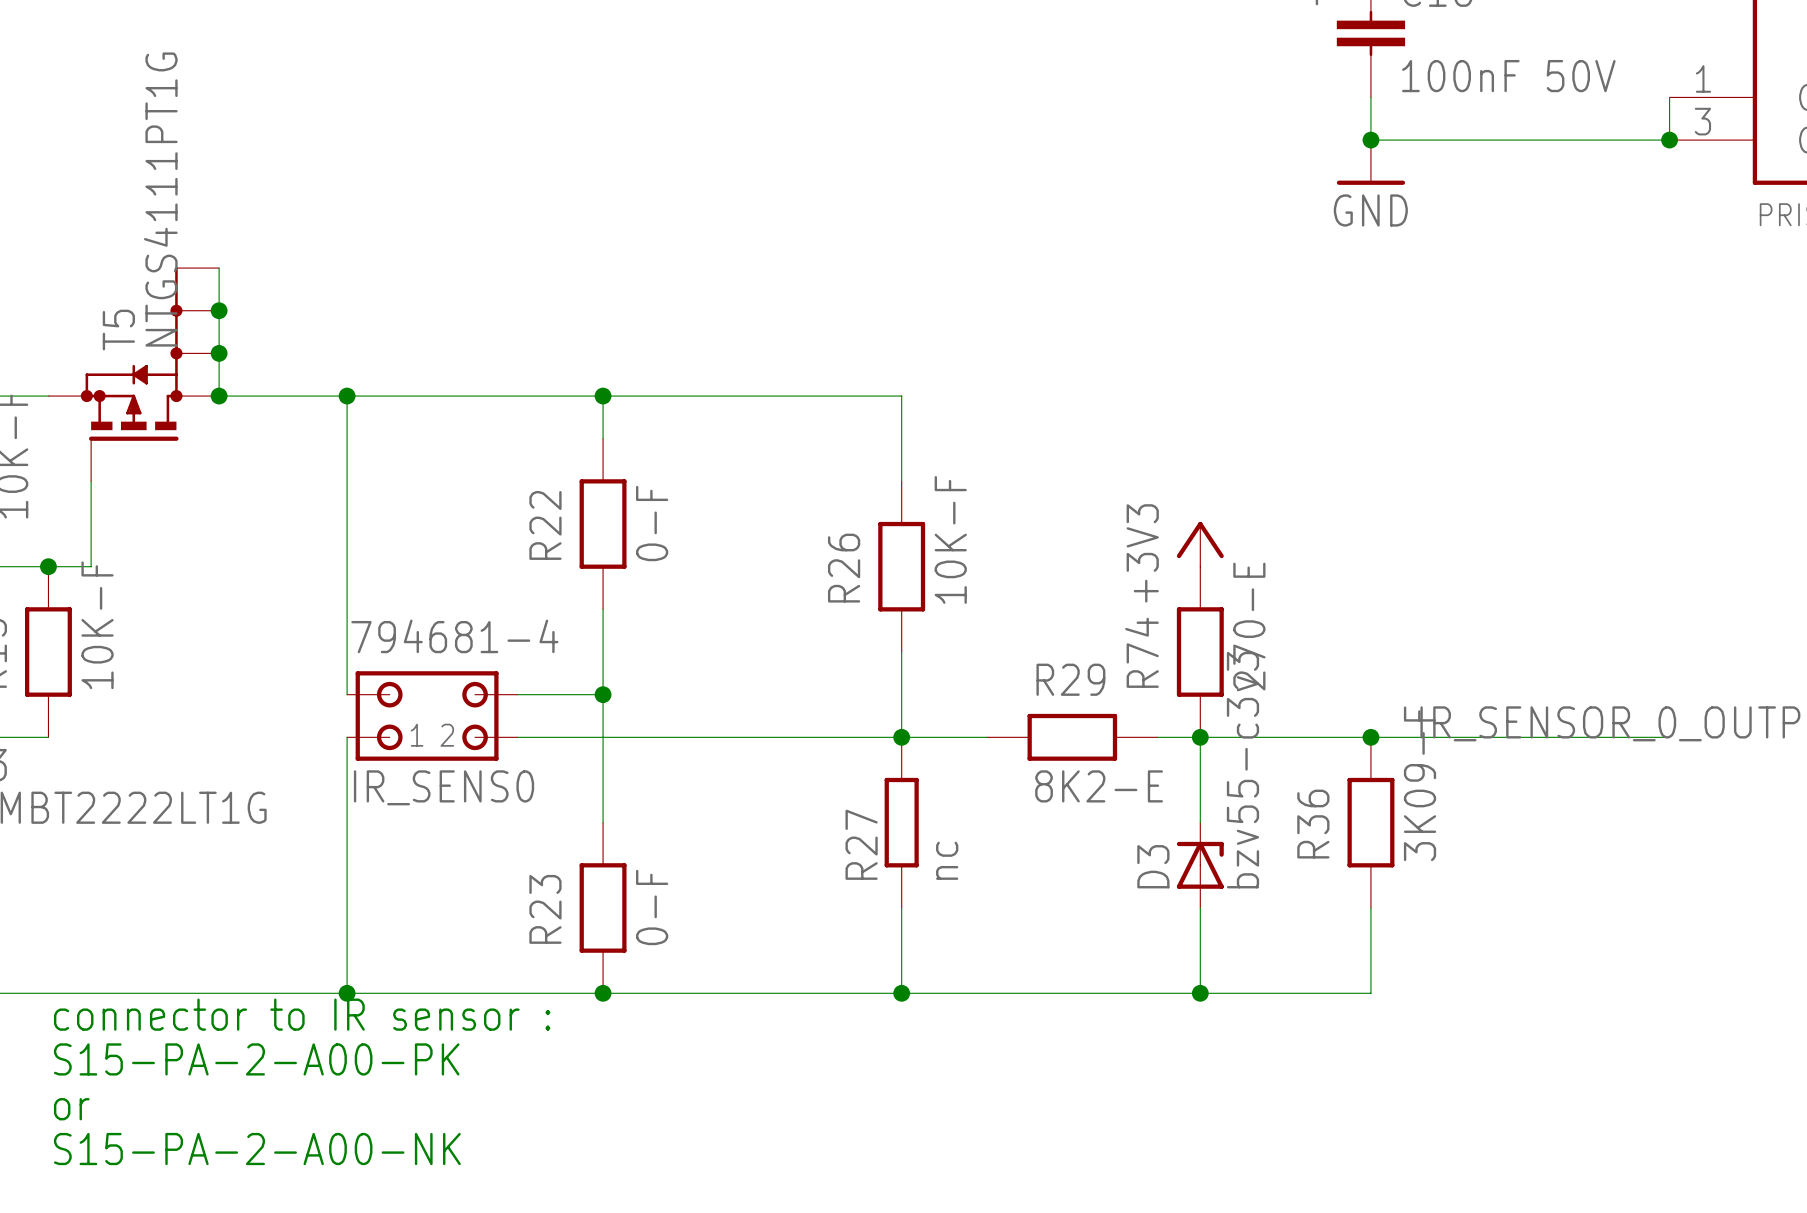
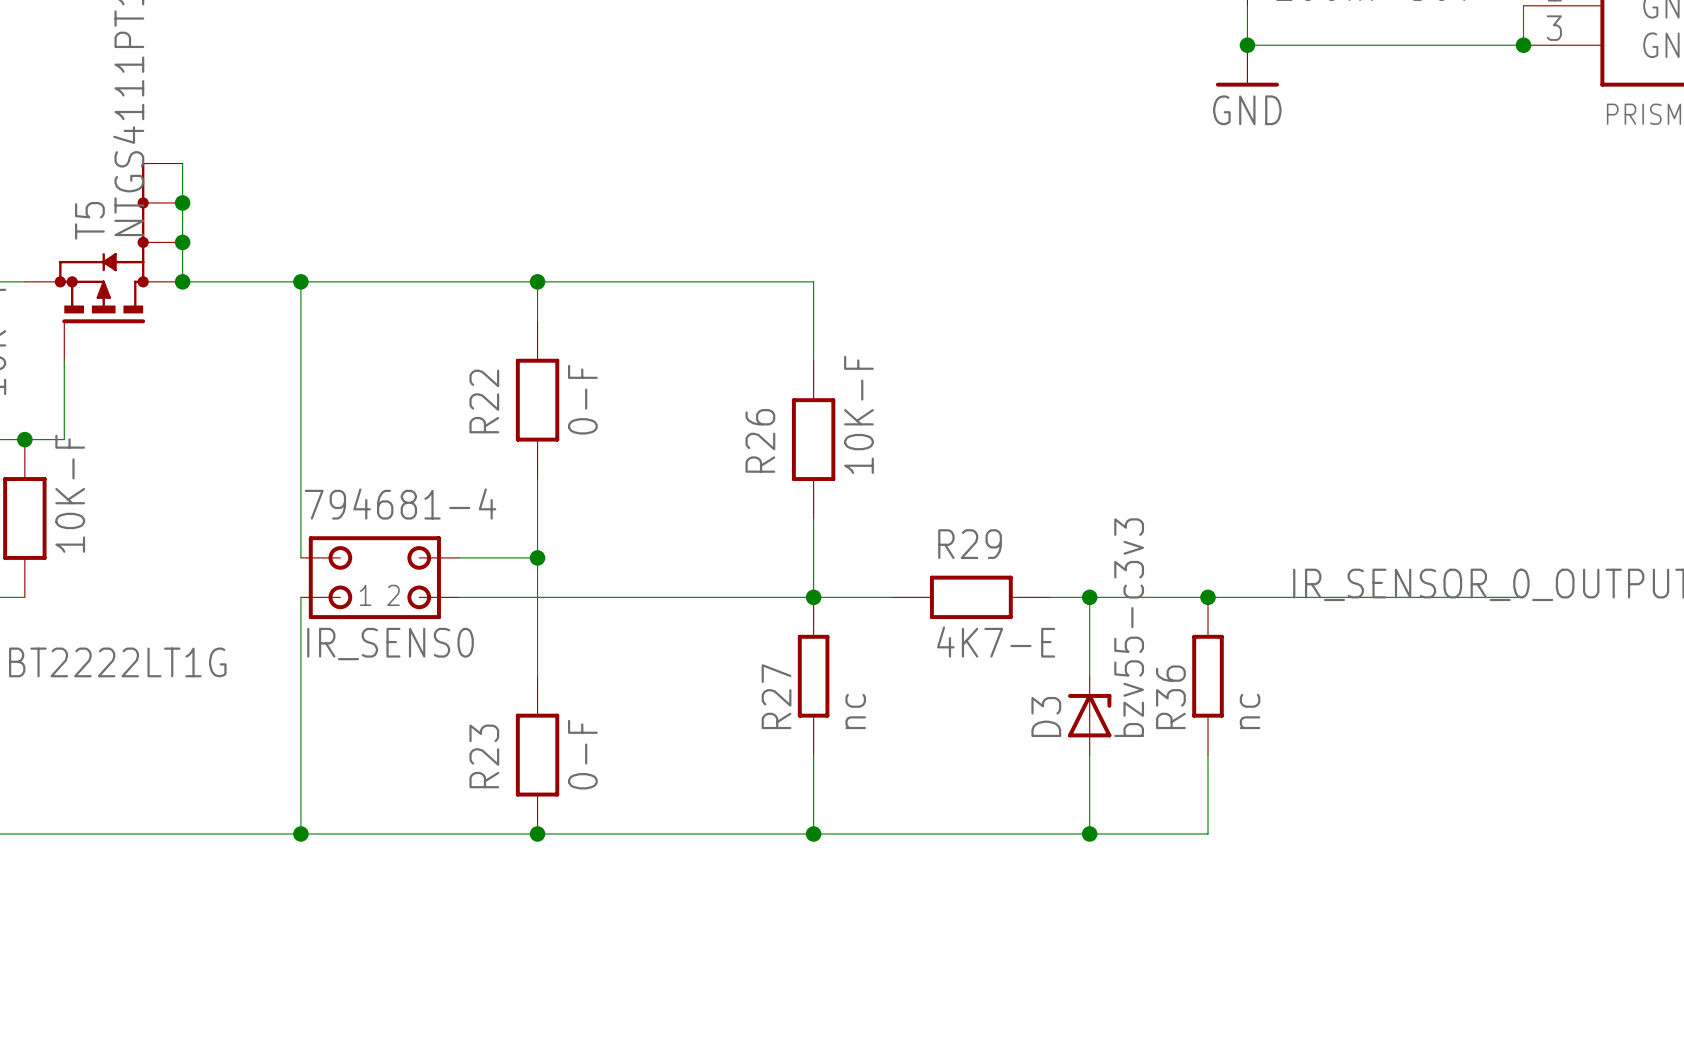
power symbol: +3V3 (1200, 544) -> none
R74: 270-E (1200, 652) -> none
R36 symbol: [1347, 737, 1395, 908] -> [1192, 597, 1224, 756]
junction position: (1370, 737) -> (1208, 597)
R36 value: 3K09-F (1420, 783) -> nc (1250, 711)
R29 value: 8K2-E (1099, 786) -> 4K7-E (996, 642)
wire: (1370, 907) (1370, 993) (1328, 993) -> (1208, 755) (1208, 833)
text: connector to IR sensor : (302, 1014) -> none
text: S15-PA-2-A00-PK (256, 1059) -> none
text: or (71, 1109) -> none
text: S15-PA-2-A00-NK (257, 1149) -> none

